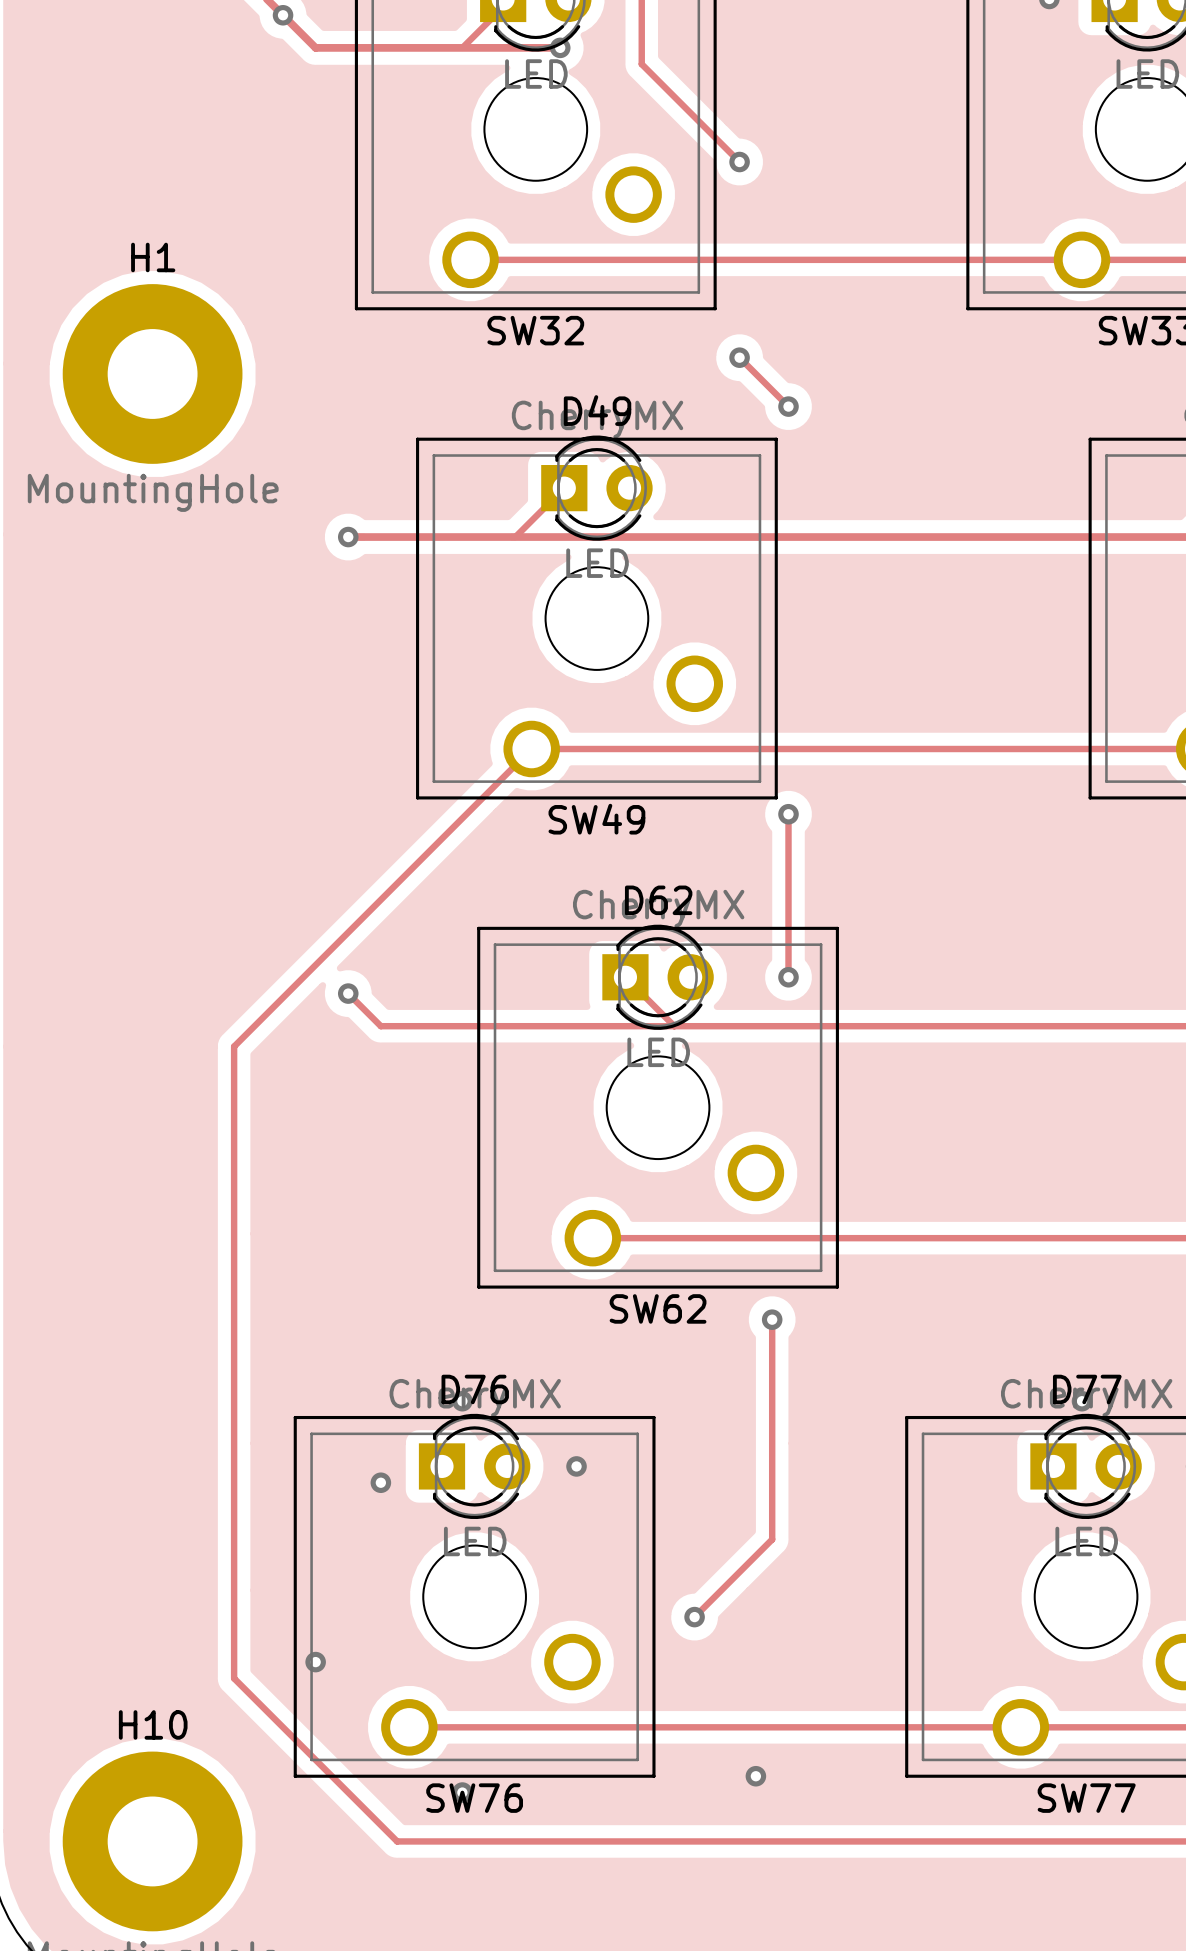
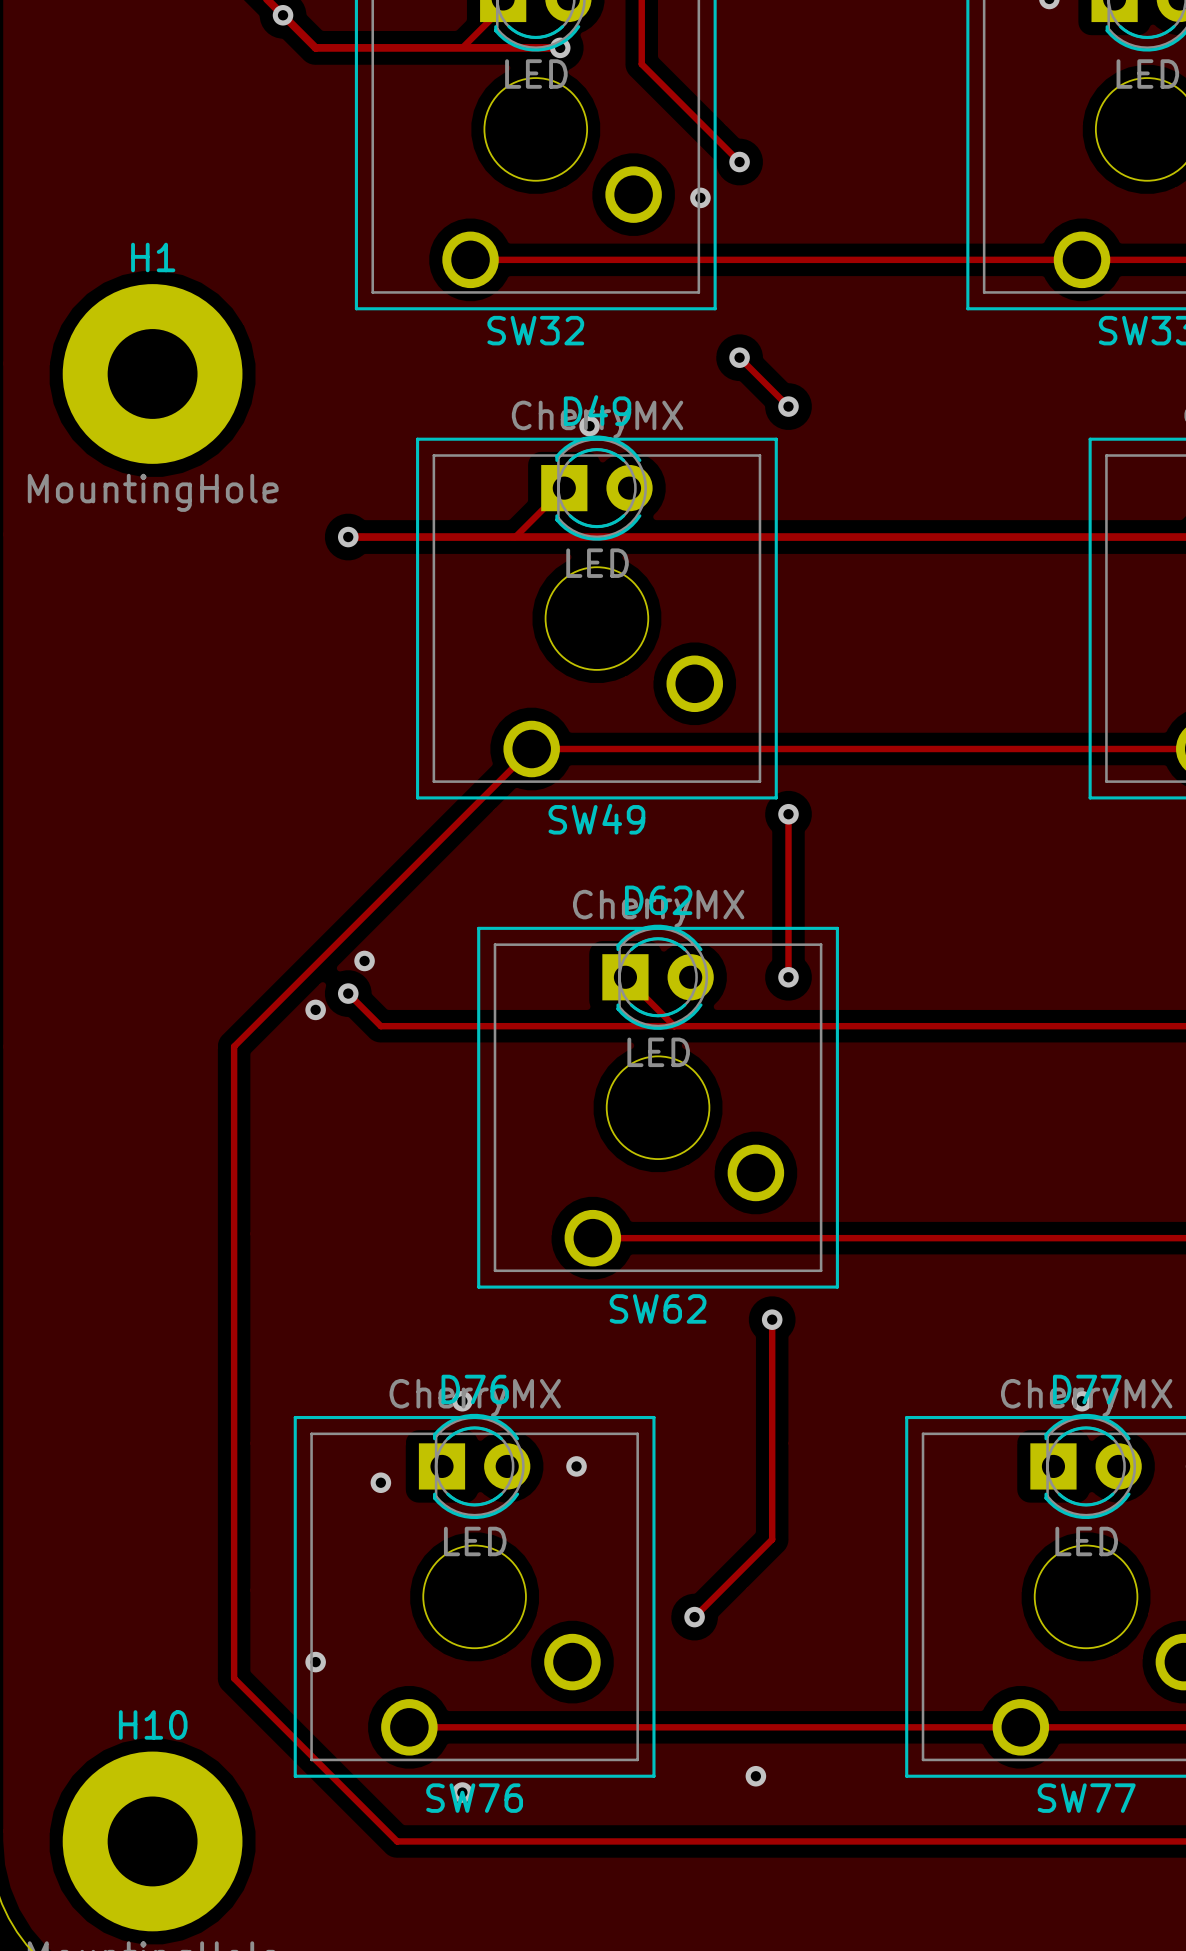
via: none -> (700, 197)
via: none -> (589, 426)
via: none -> (364, 960)
via: none -> (315, 1009)

